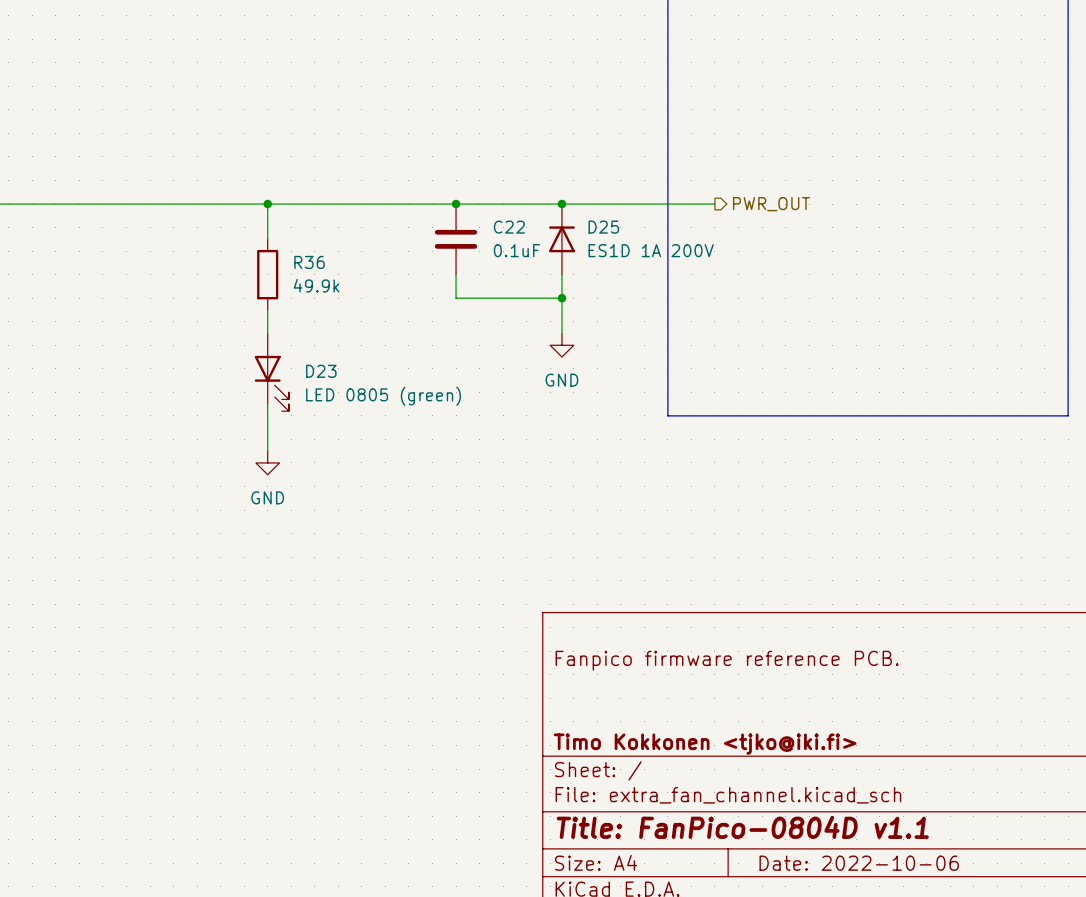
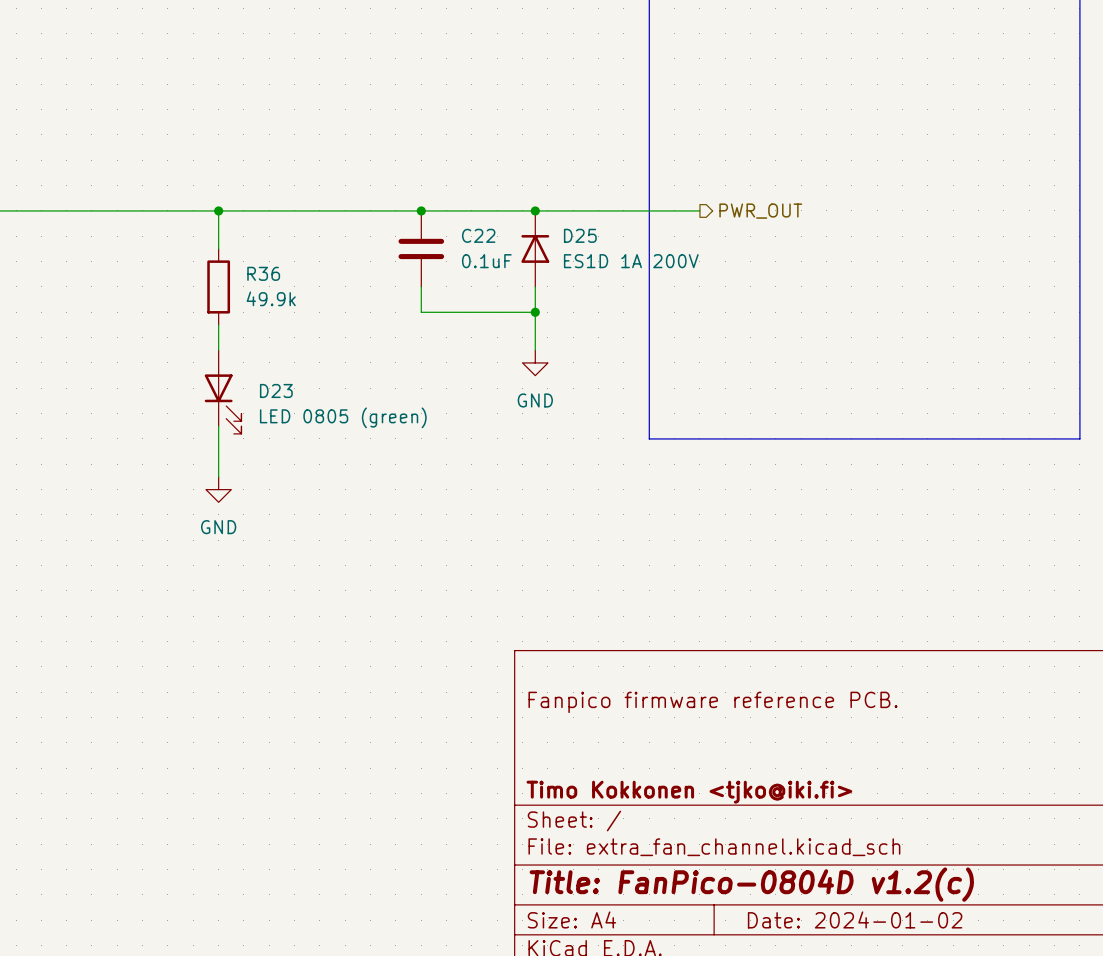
title block: Title: FanPico-0804D v1.1 (742, 827) -> Title: FanPico-0804D v1.2(c) (751, 884)
title block: Date: 2022-10-06 (859, 863) -> Date: 2024-01-02 (855, 919)

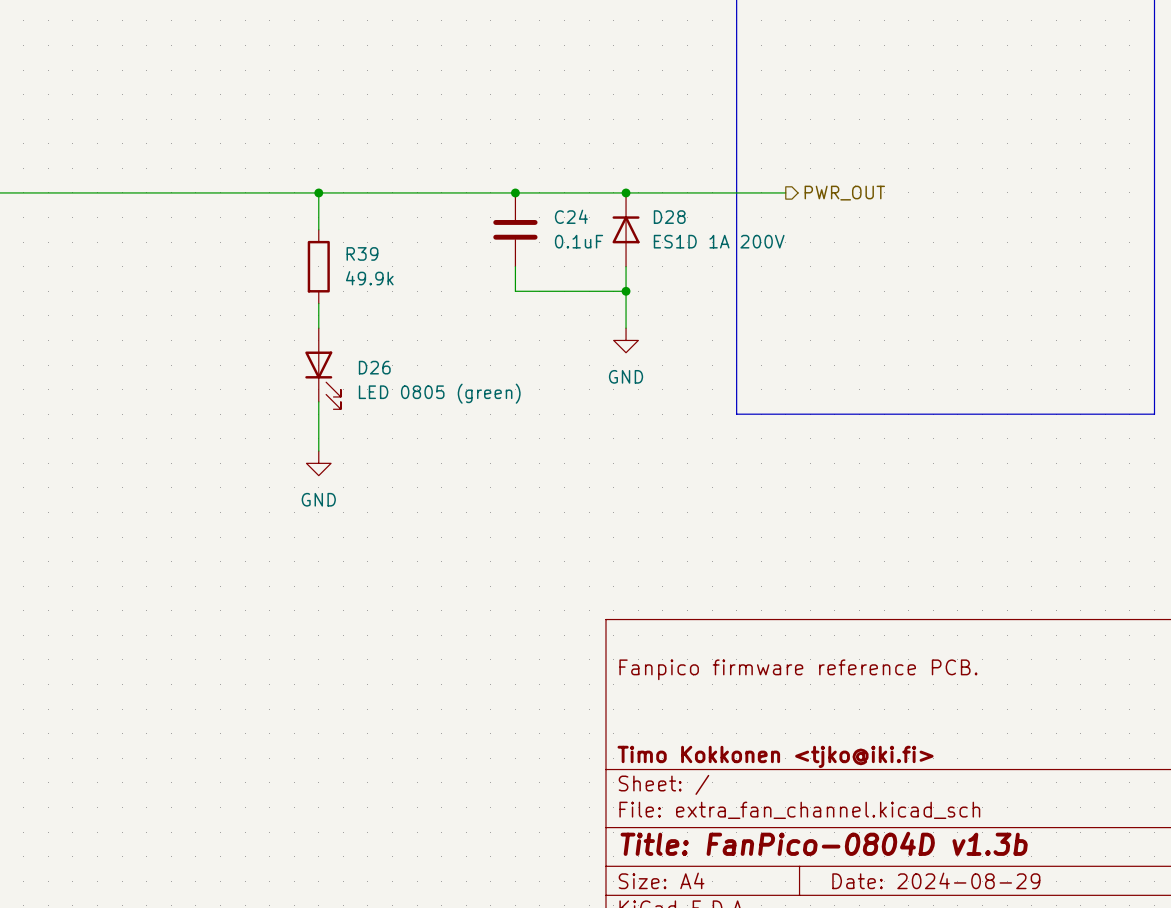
C22 name: C22 (478, 235) -> C24 (571, 216)
D25 name: D25 (580, 235) -> D28 (669, 217)
R36 name: R36 (263, 273) -> R39 (362, 253)
D23 name: D23 (276, 390) -> D26 (374, 367)
title block: Title: FanPico-0804D v1.2(c) (751, 884) -> Title: FanPico-0804D v1.3b (824, 843)
title block: Date: 2024-01-02 (855, 919) -> Date: 2024-08-29 (936, 880)

